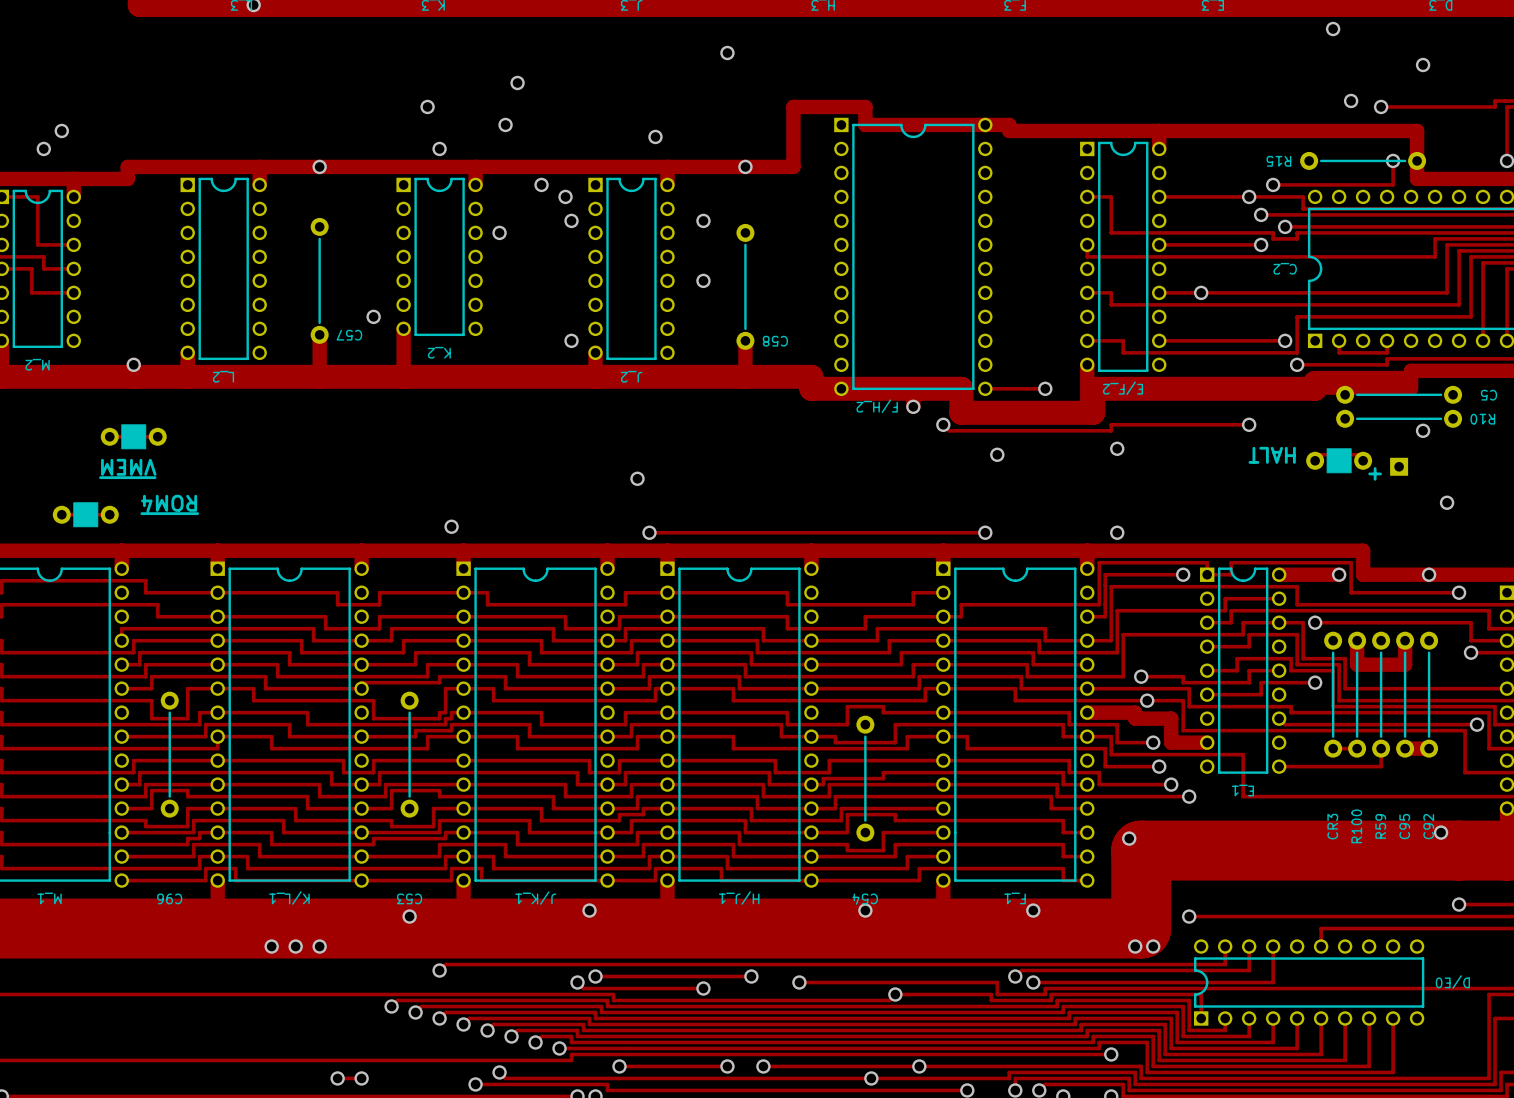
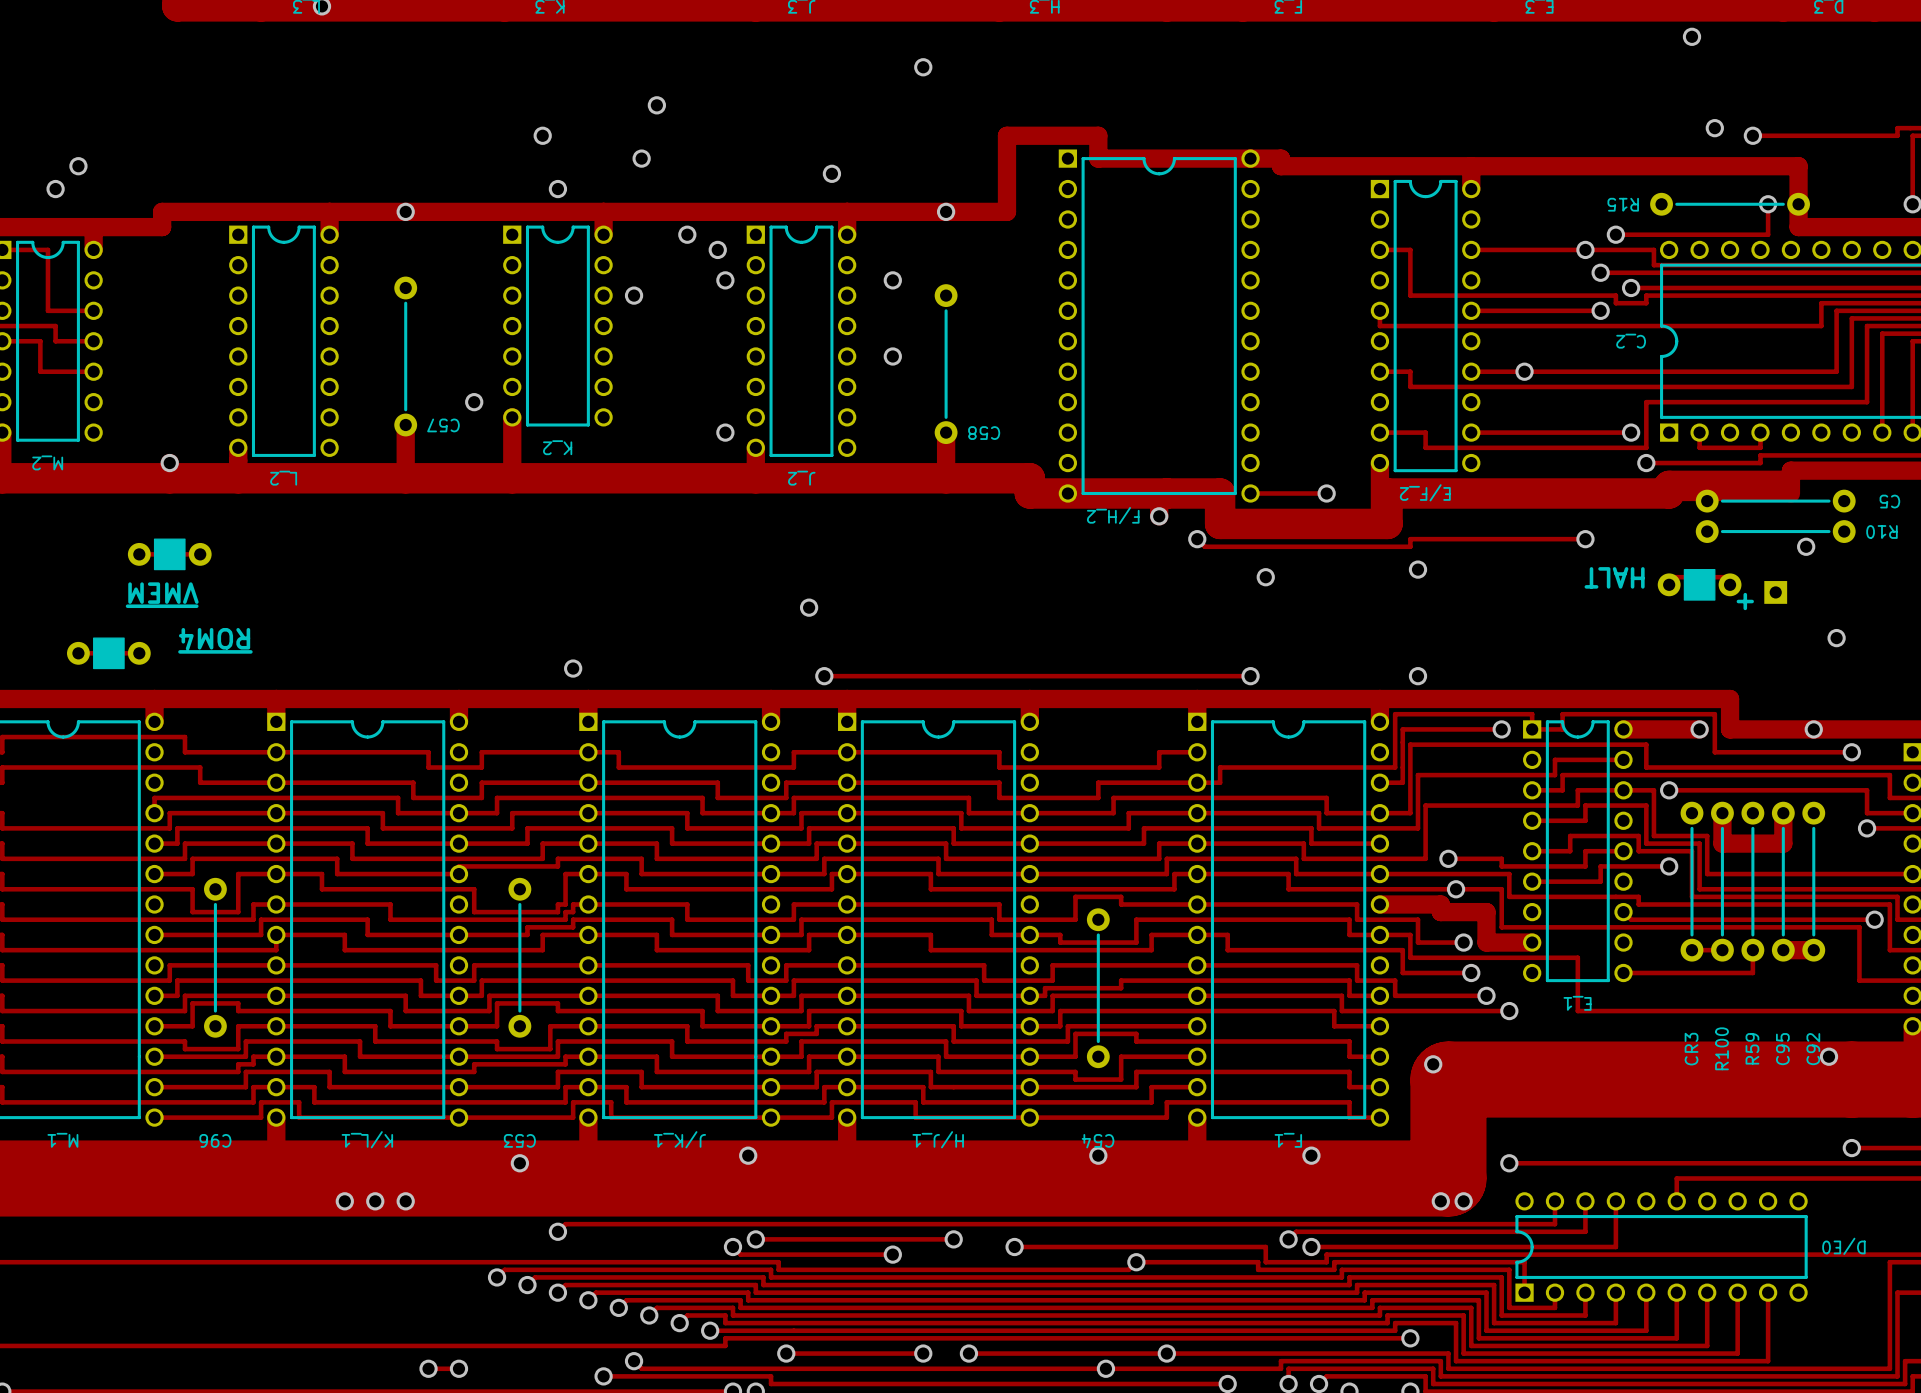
via: (1423, 64) -> none

